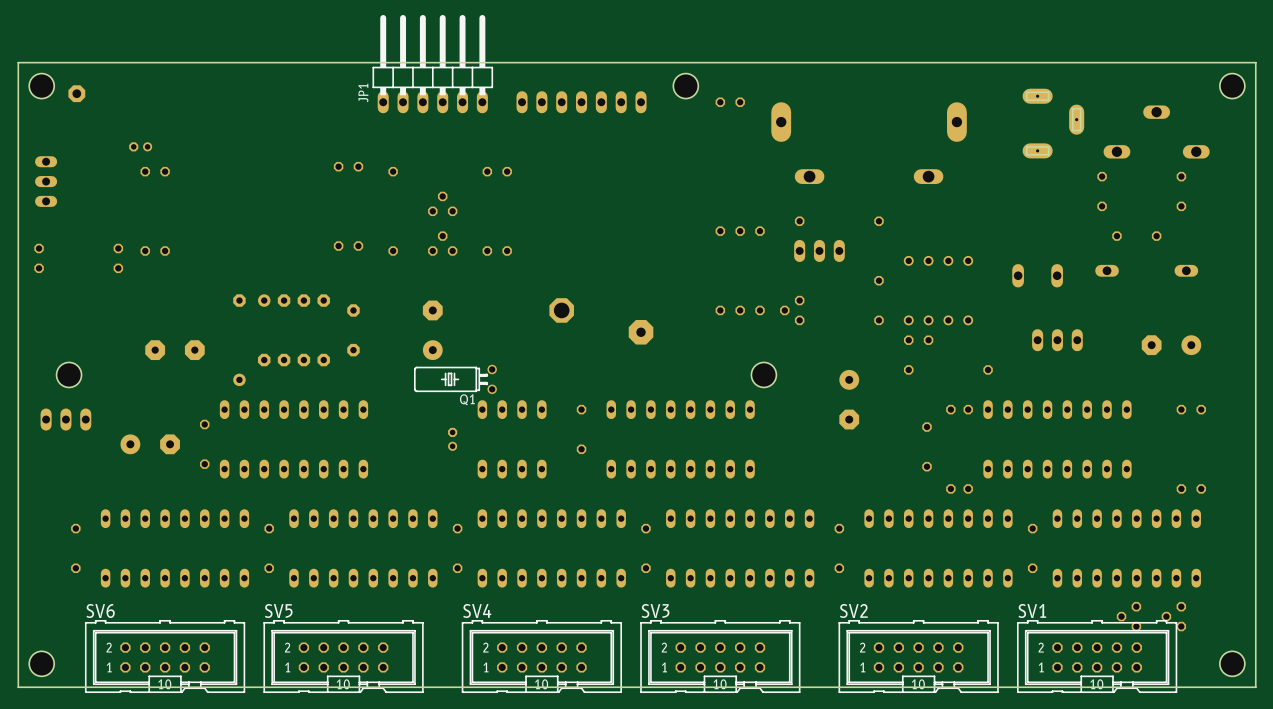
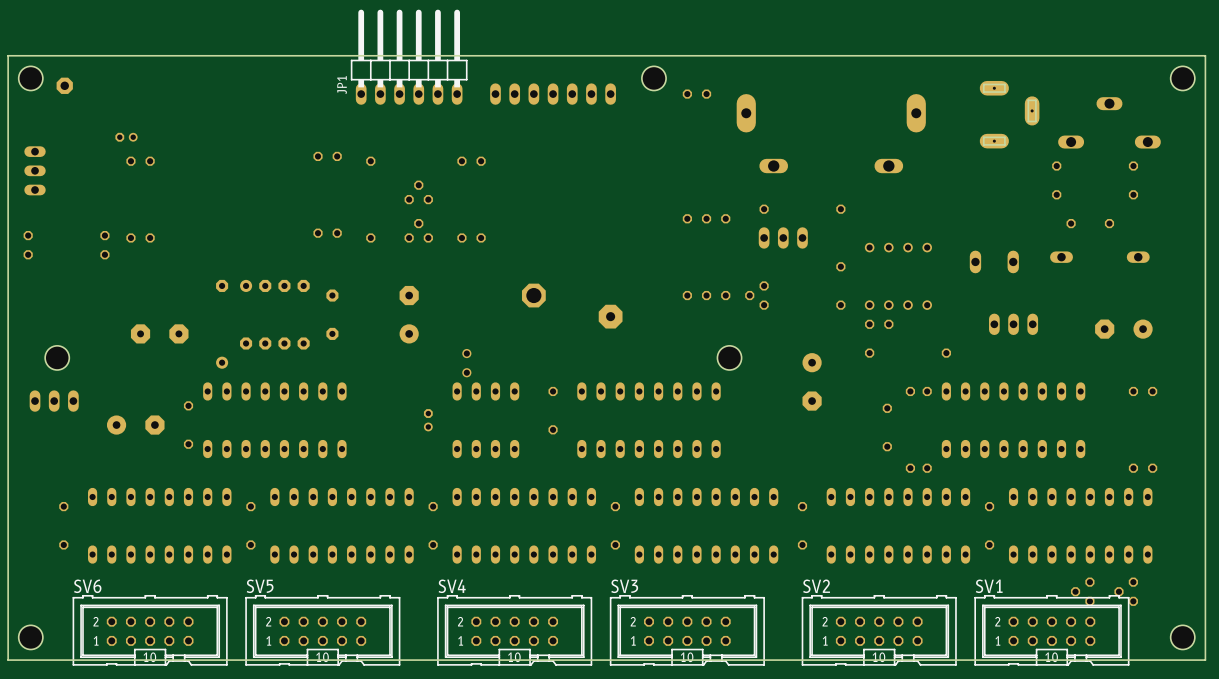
Q1 side: bottom (455, 379) -> top (466, 363)

